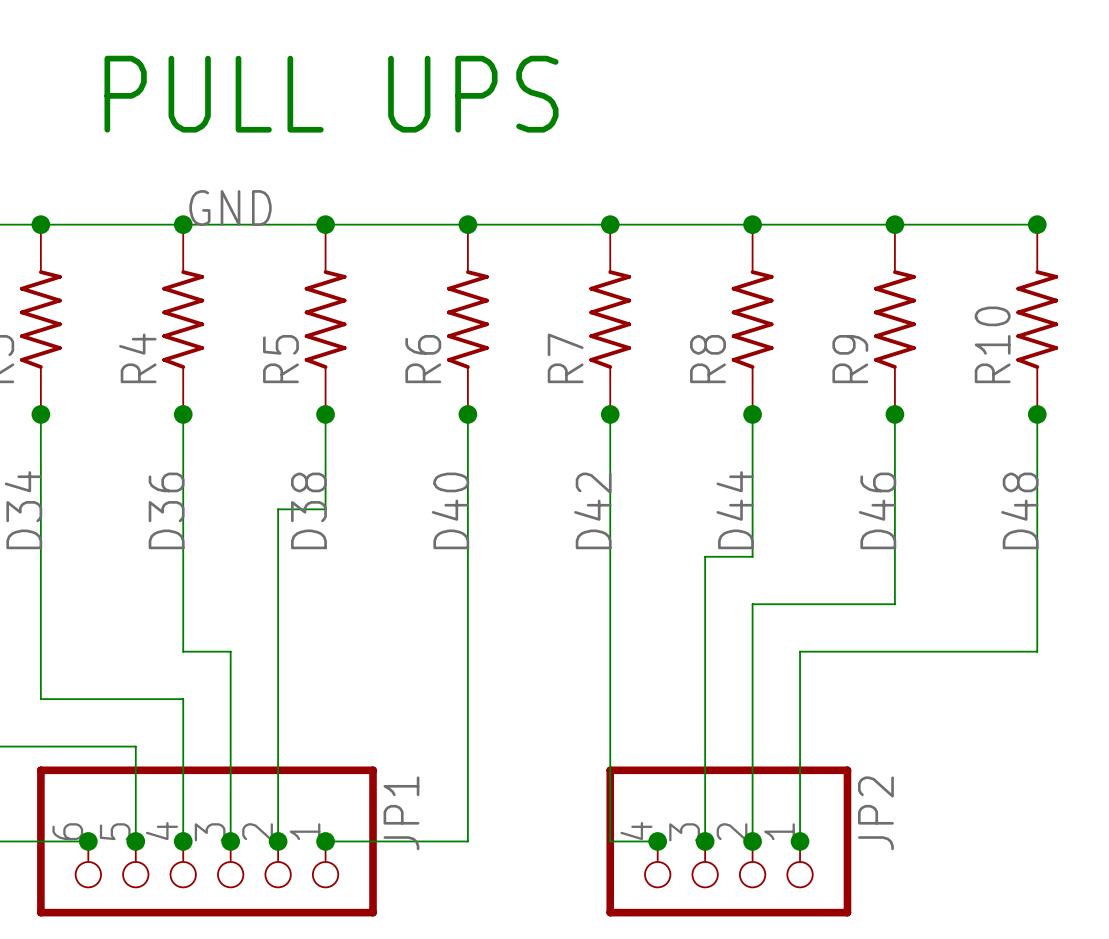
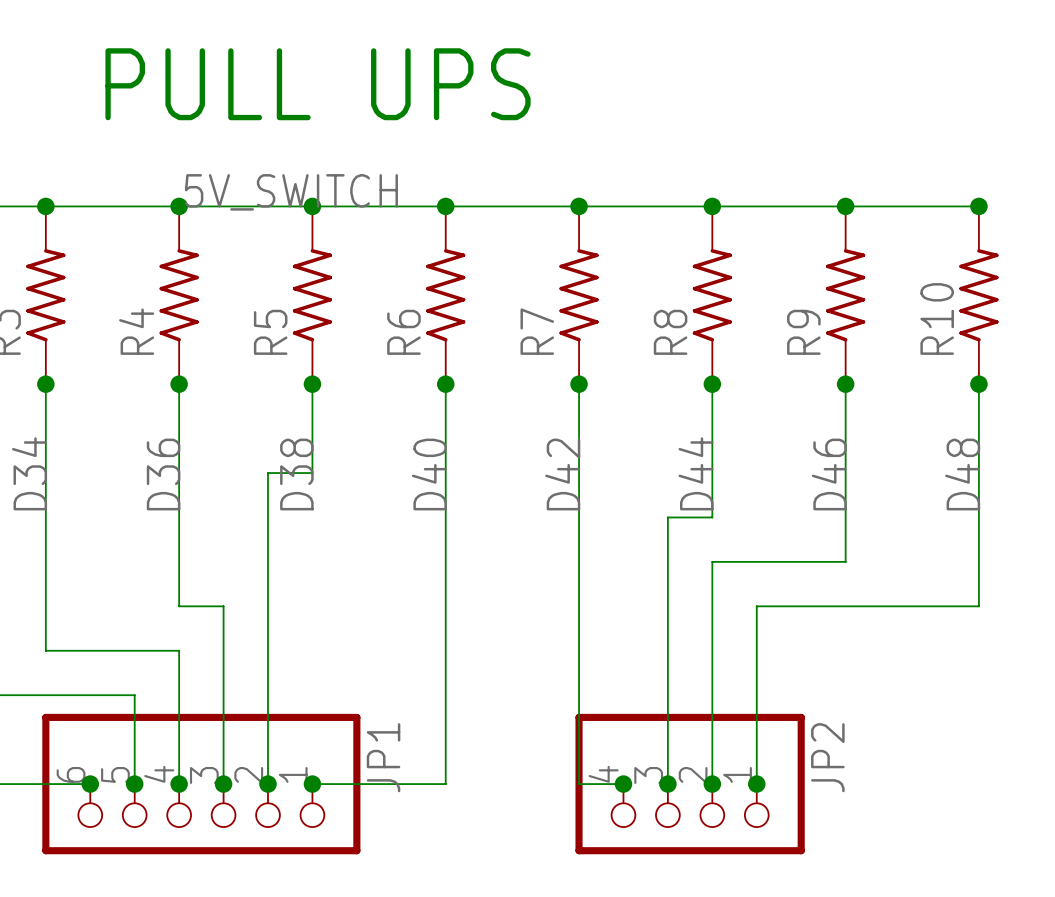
label: GND (230, 208) -> 5V_SWITCH (291, 192)

